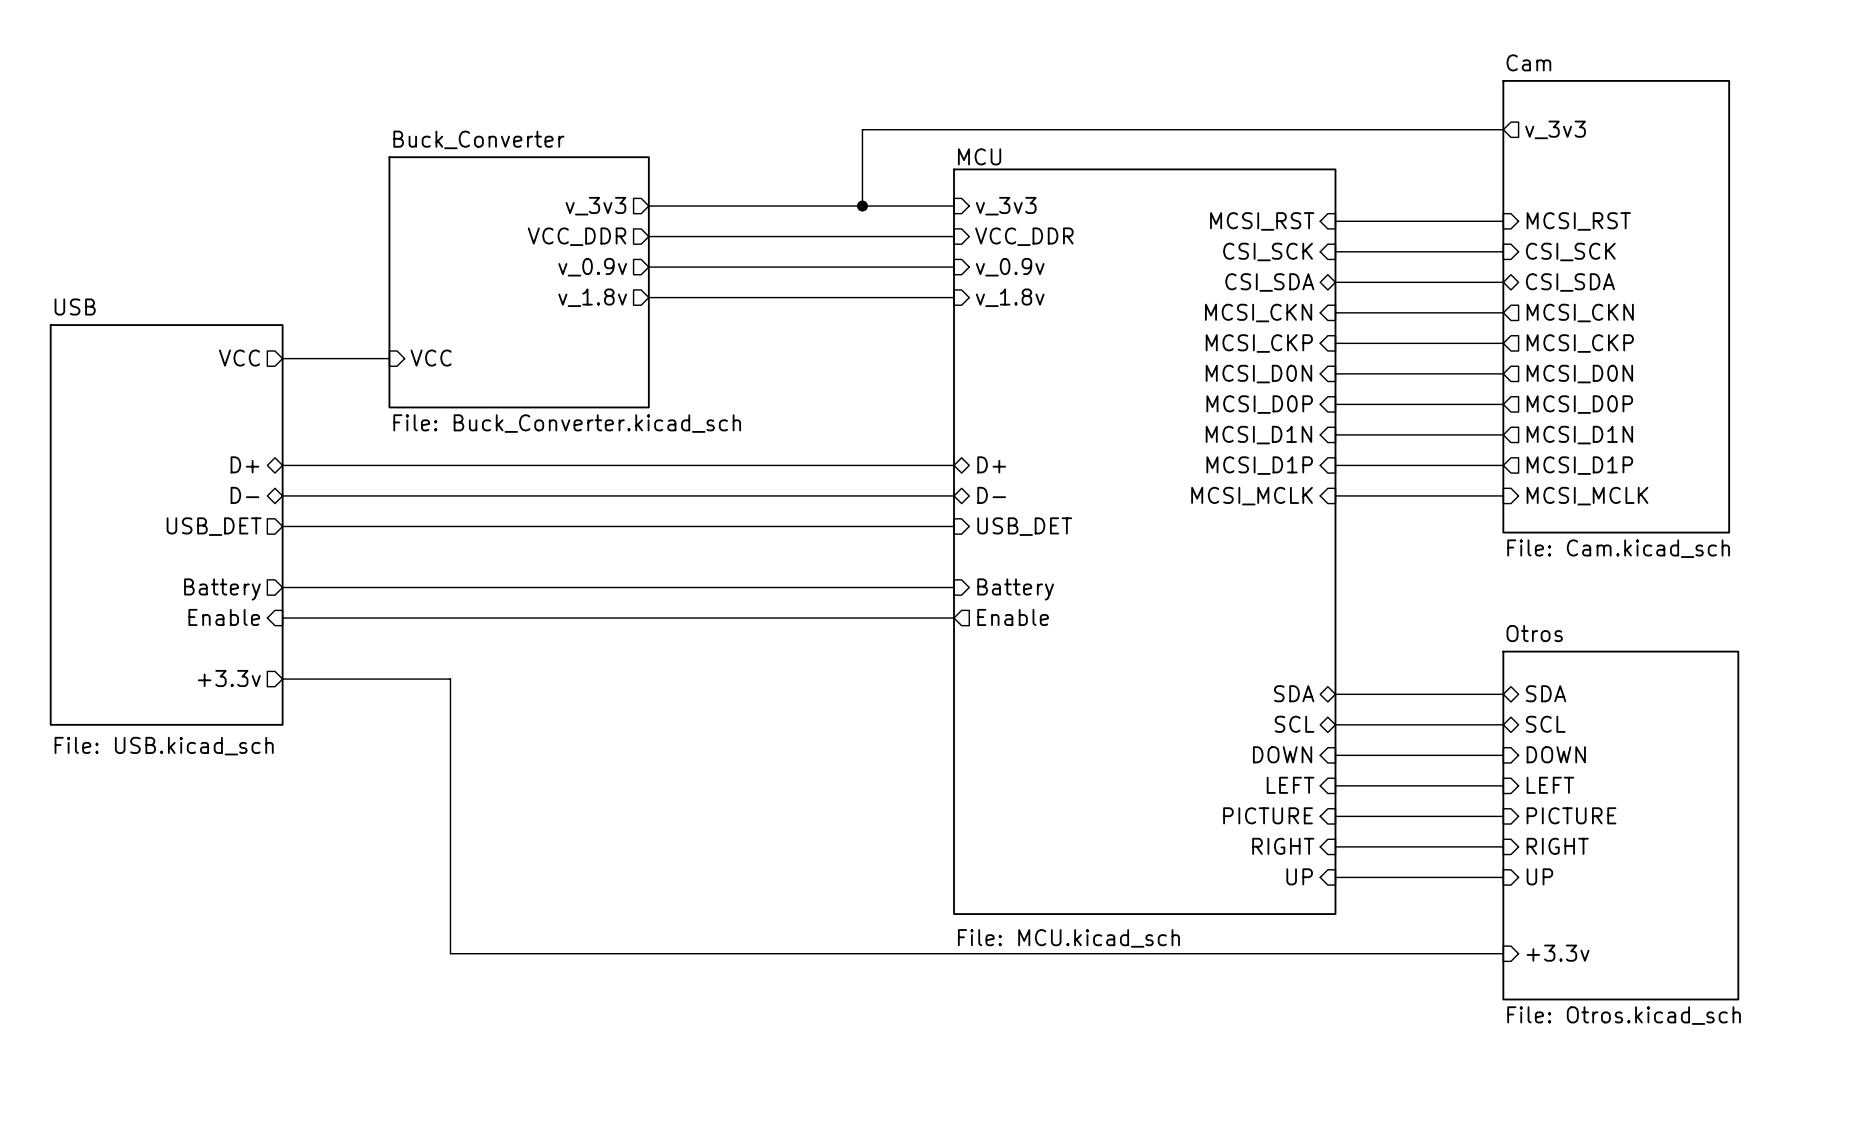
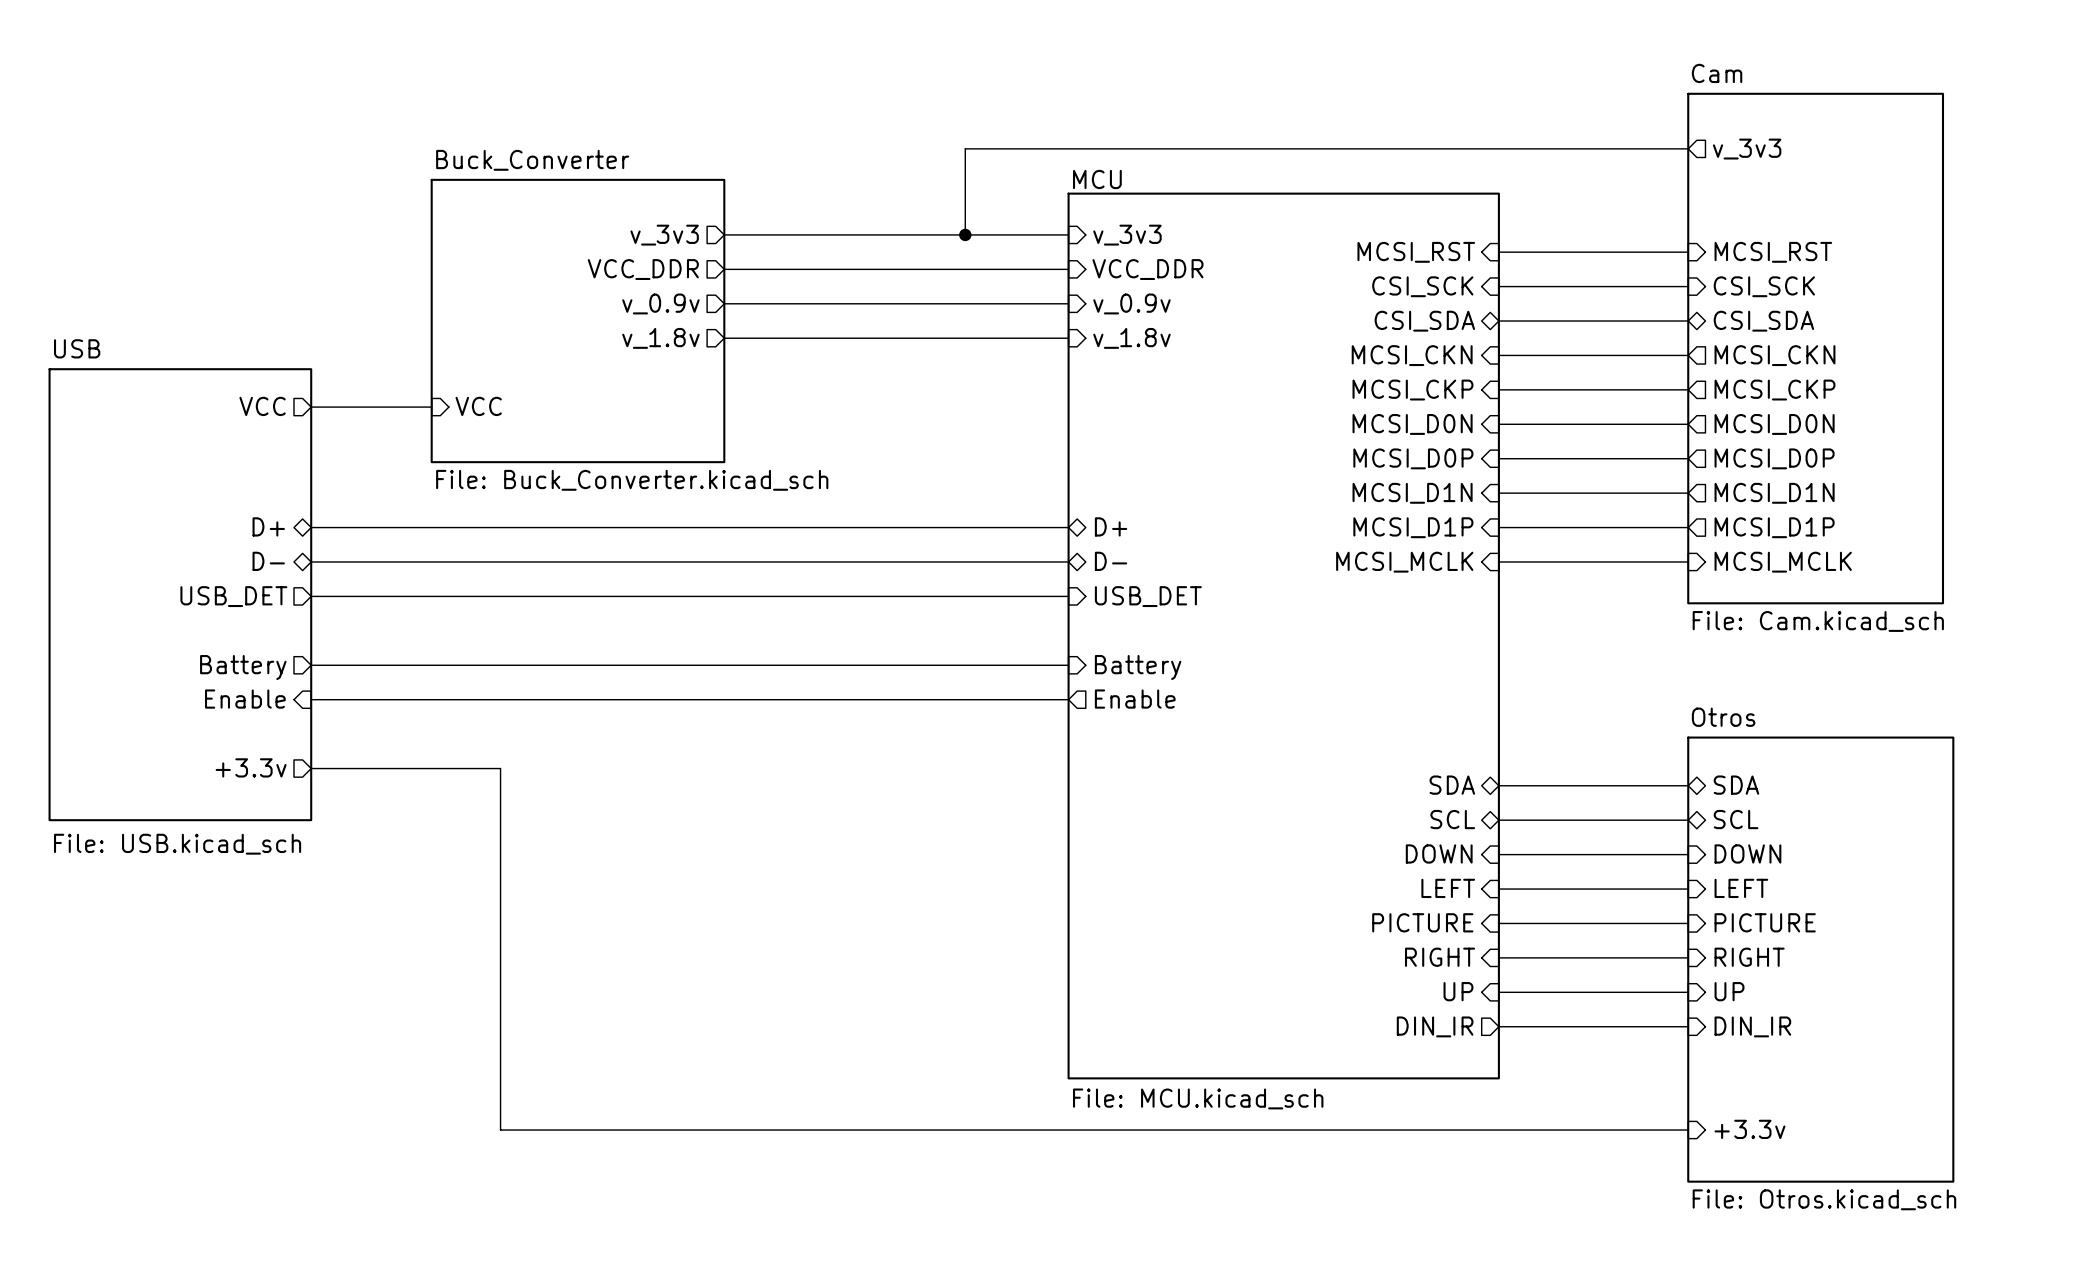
sheet MCU: File: MCU.kicad_sch (1144, 541) -> none
sheet MCU: none -> File: MCU.kicad_sch (1283, 636)
sheet Otros: File: Otros.kicad_sch (1620, 825) -> none
sheet Otros: none -> File: Otros.kicad_sch (1820, 959)
wire: none -> (1498, 1026) (1688, 1026)
sheet pin: none -> DIN_IR (1435, 1026)
sheet pin: none -> DIN_IR (1752, 1026)
wire: (450, 953) (1503, 953) -> (500, 1078) (500, 1130) (1688, 1130)
sheet pin position: +3.3v (1558, 953) -> +3.3v (1749, 1129)

